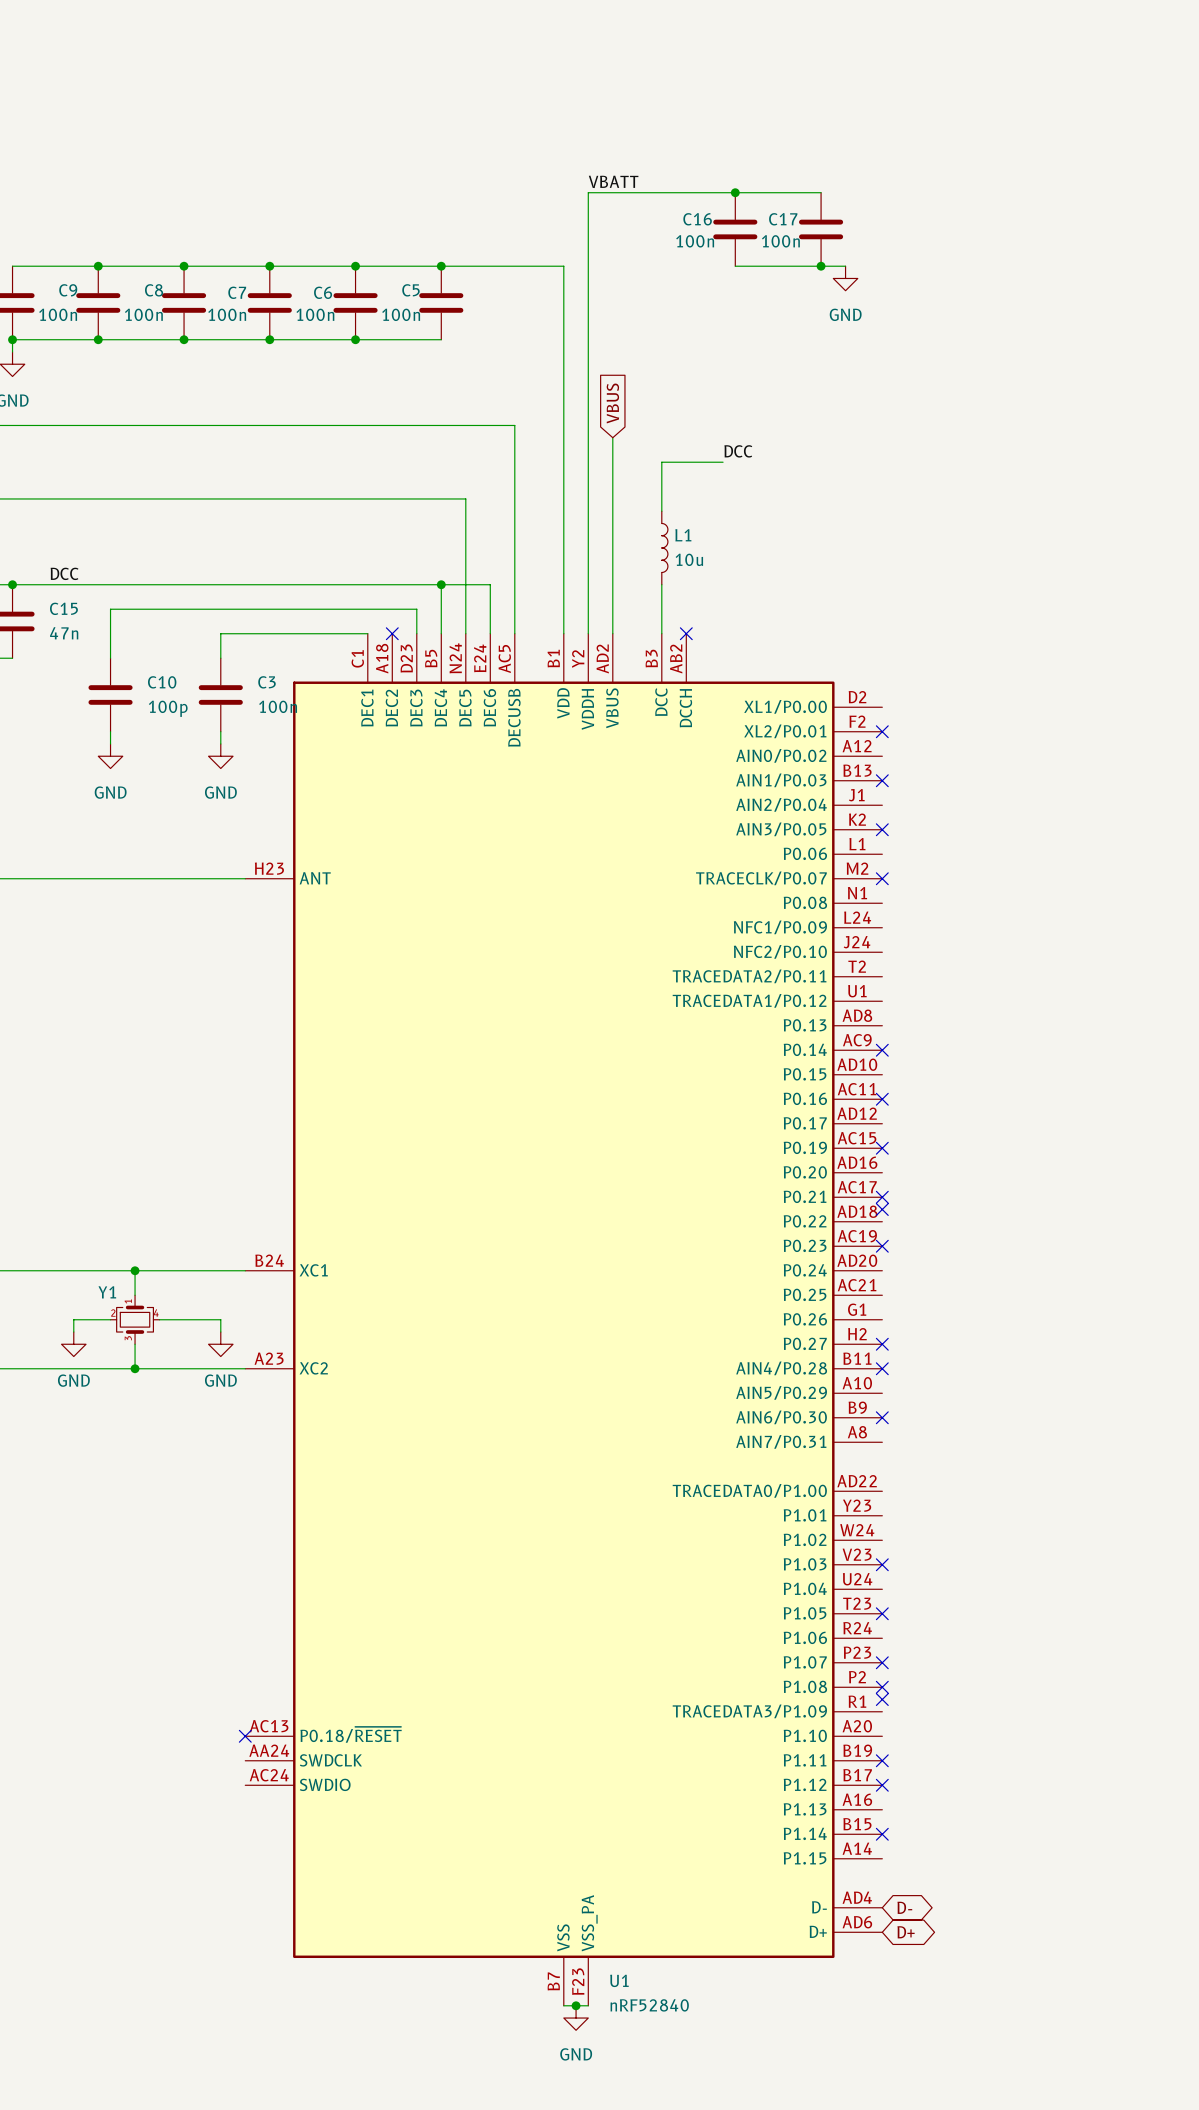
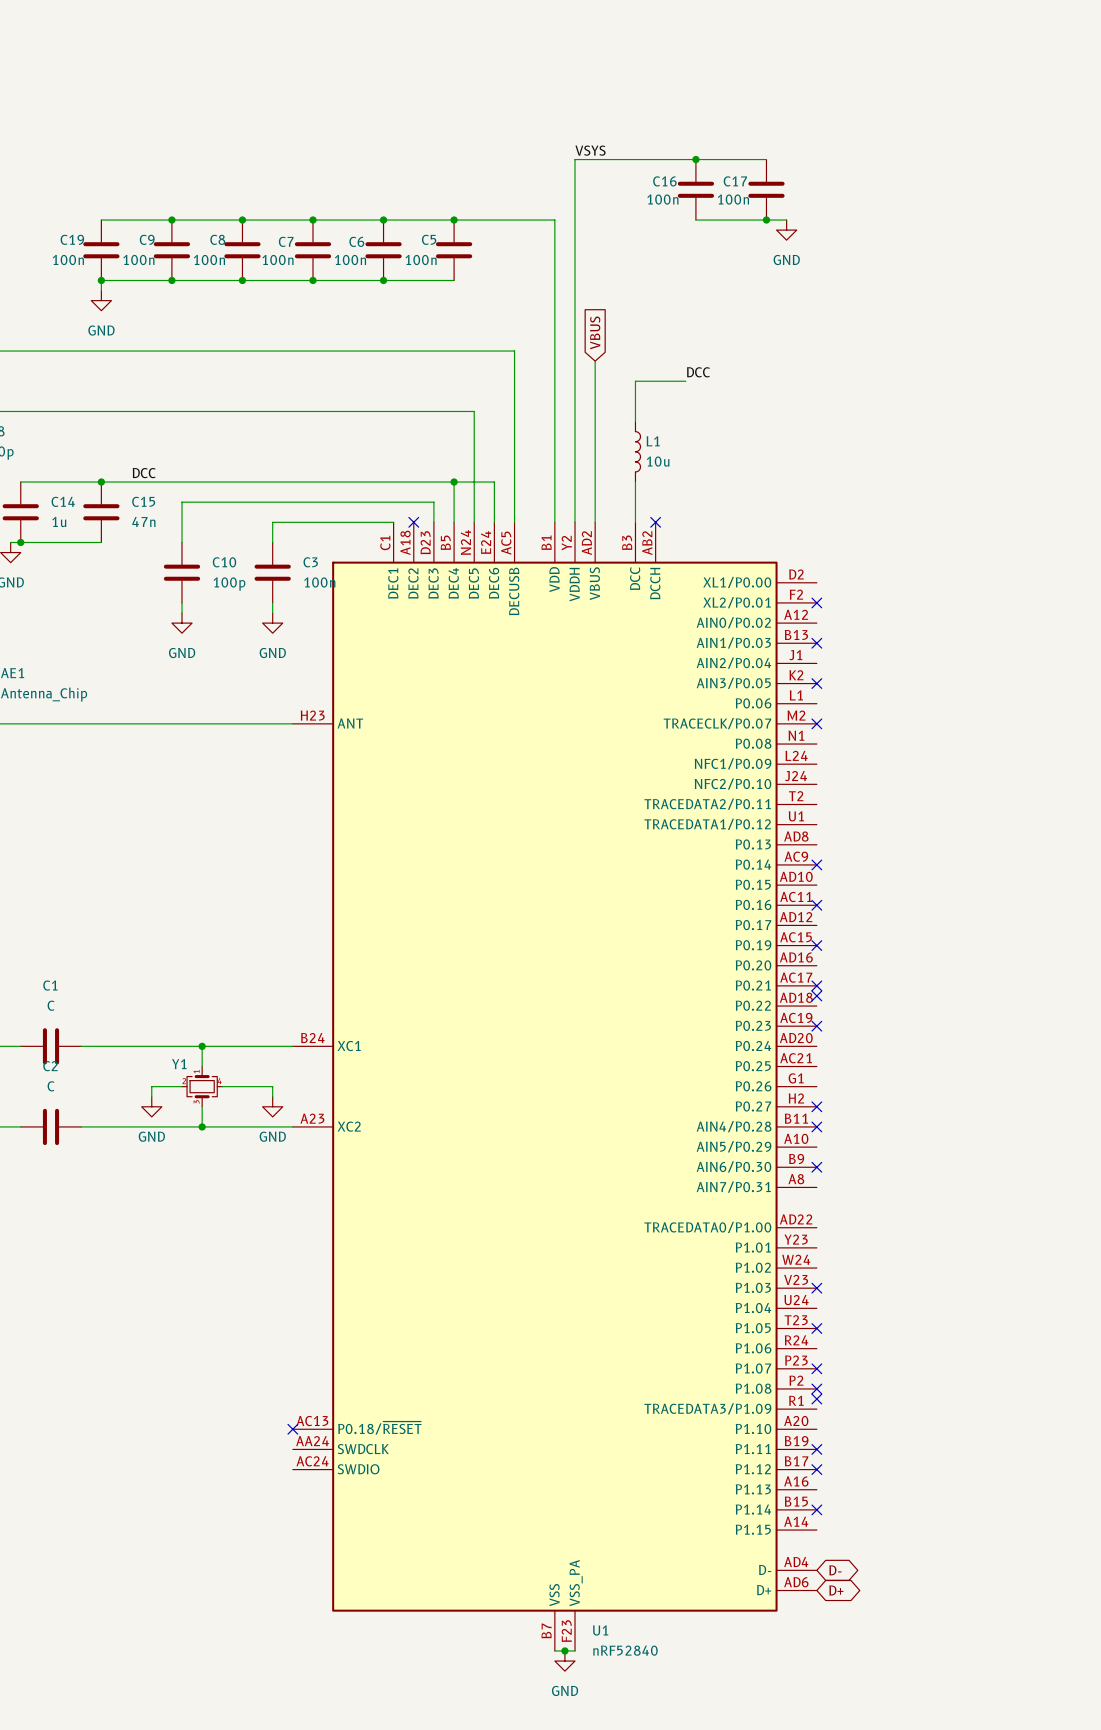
label: VBATT (613, 181) -> VSYS (590, 150)

